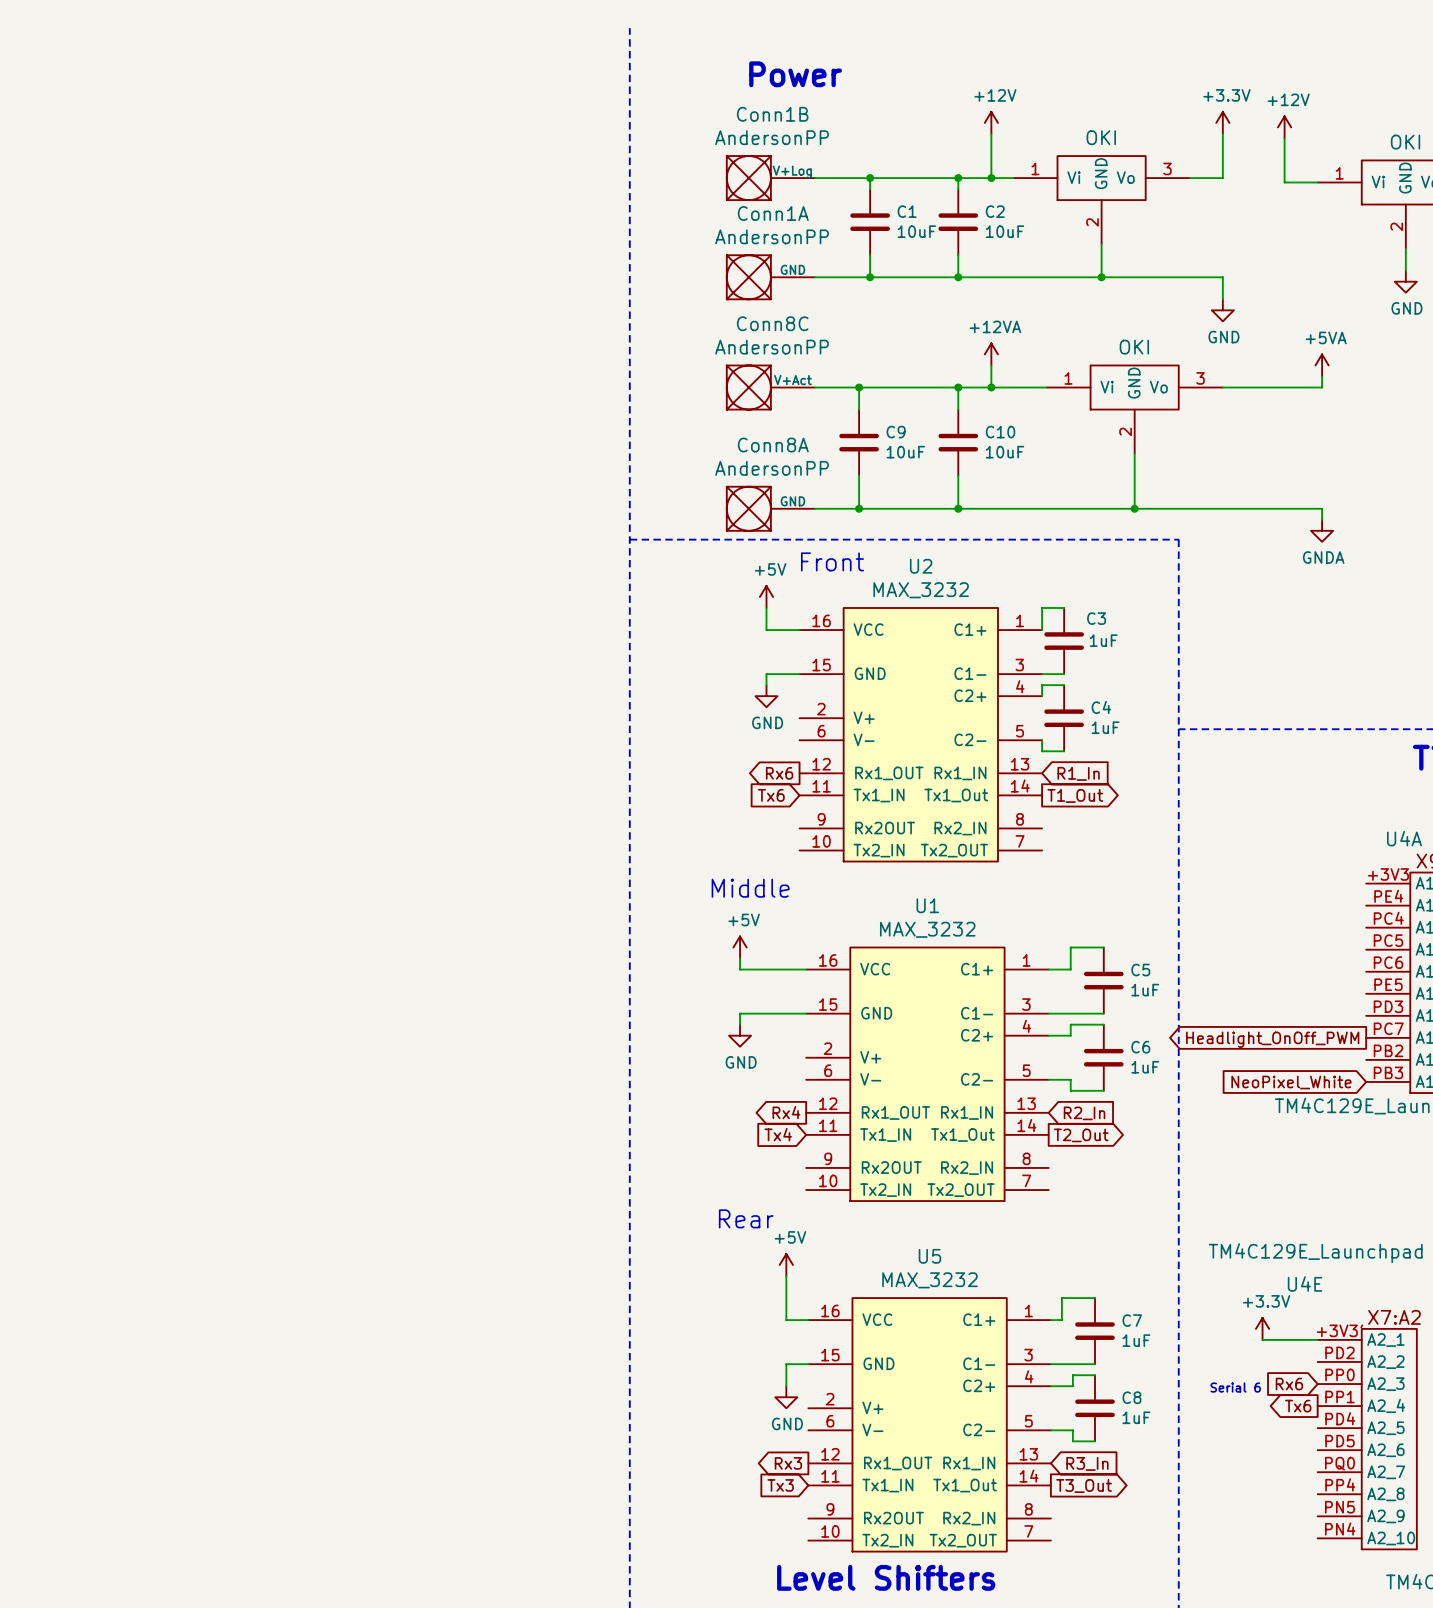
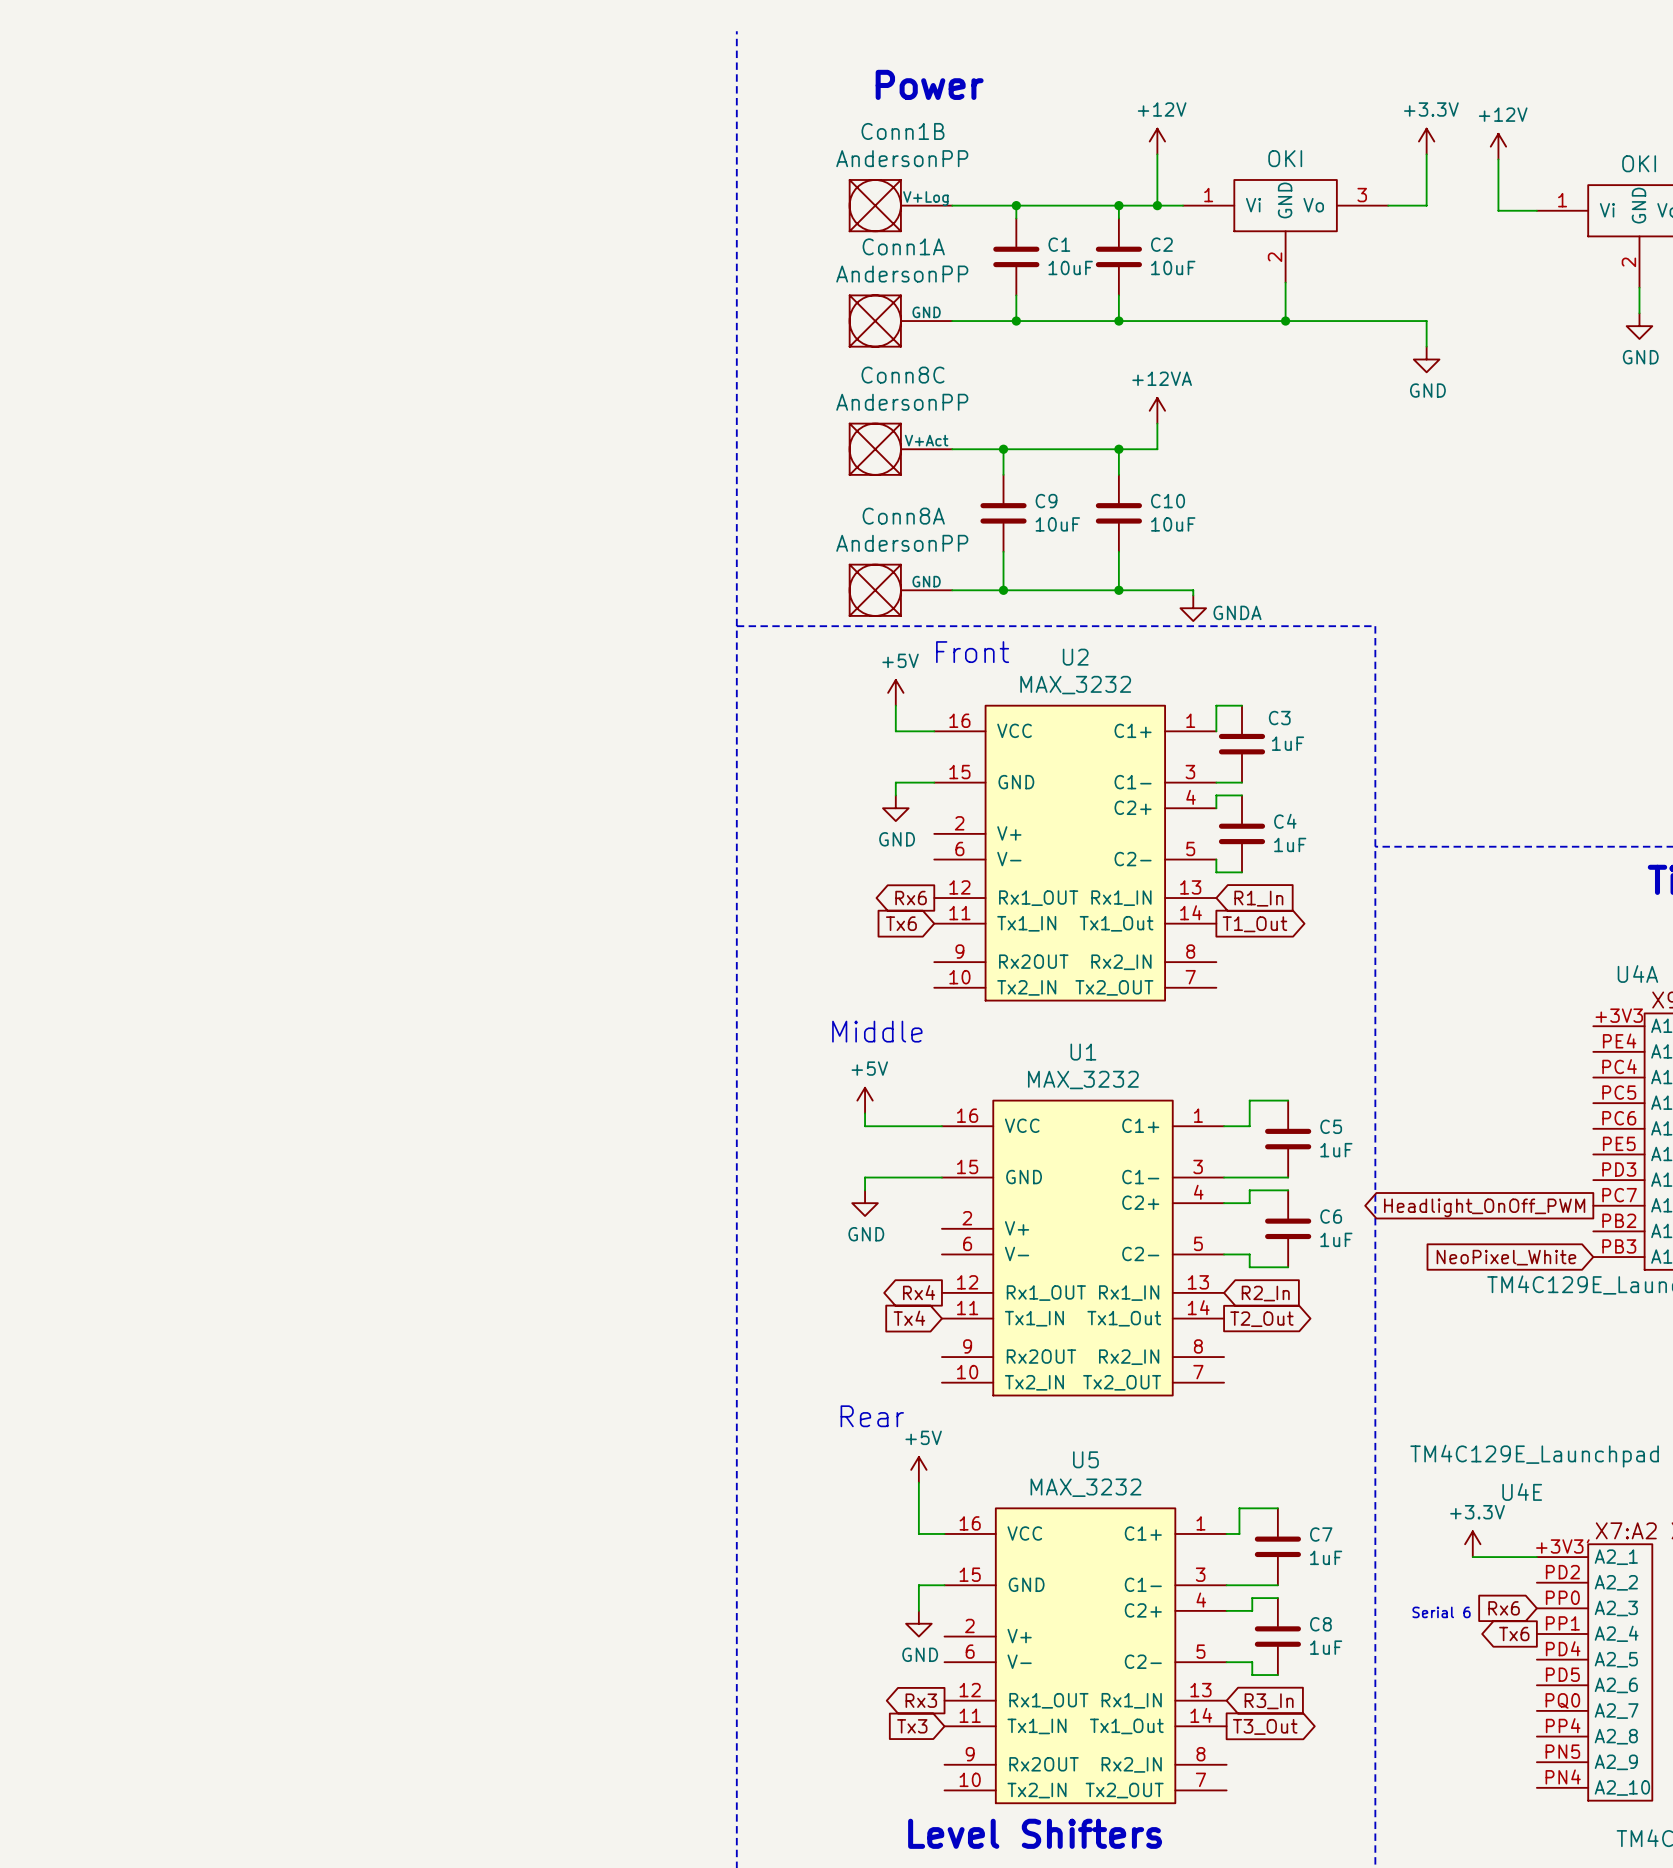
power symbol: +5VA (1322, 365) -> none
wire: (1322, 376) (1322, 387) (1222, 387) -> none
wire: (991, 387) (1046, 387) -> none
junction: (991, 387) -> none
part: OKI (1134, 409) -> none
wire: (1134, 453) (1134, 508) -> none
wire: (1022, 508) (1322, 508) (1322, 519) -> (1193, 590) (1193, 595)
junction: (1134, 508) -> none
power symbol: none -> GNDA (1193, 608)
power symbol: GNDA (1322, 530) -> none

